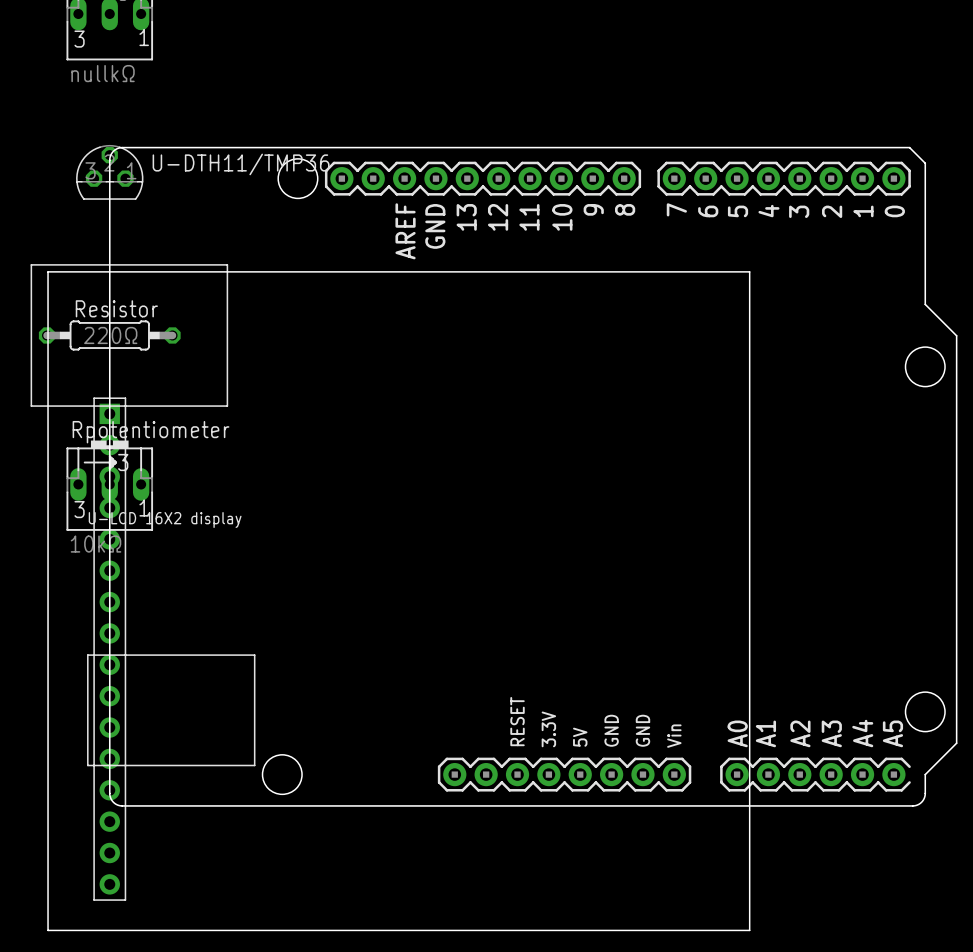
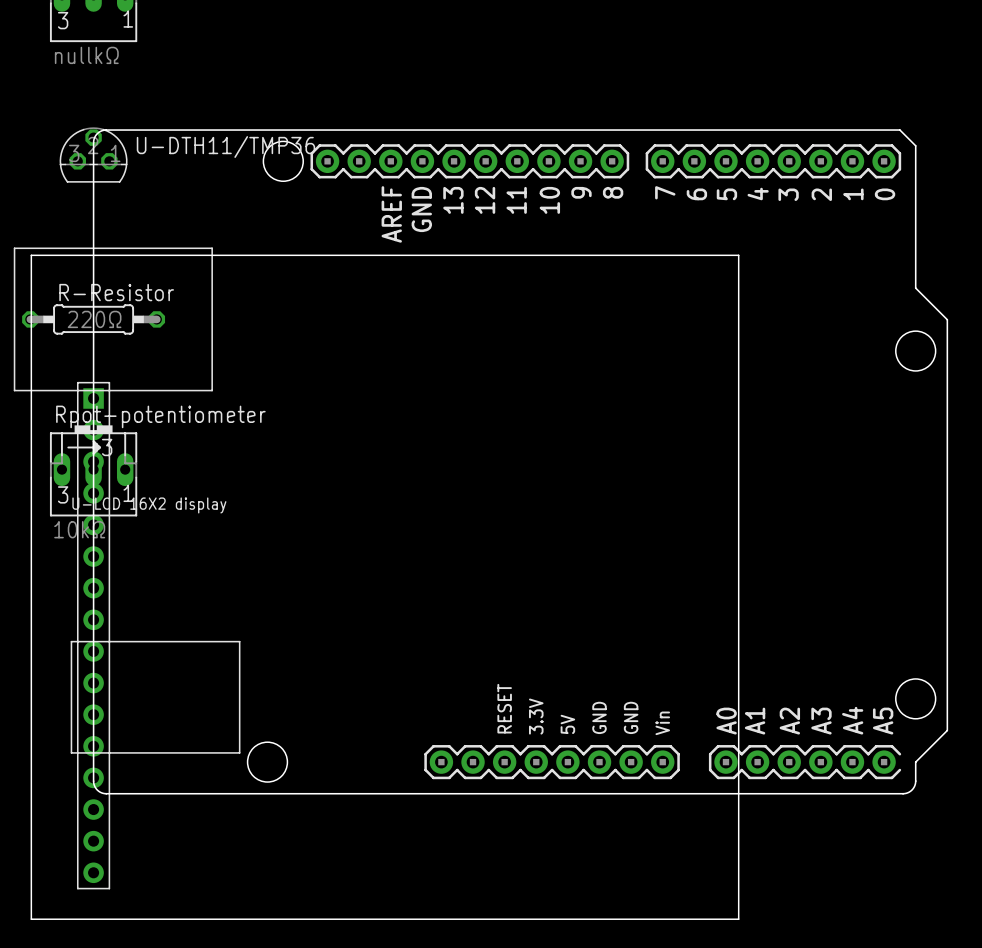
Resistor name: Resistor (116, 308) -> R-Resistor (116, 292)
Rpotentiometer name: Rpotentiometer (151, 432) -> Rpot-potentiometer (160, 416)

